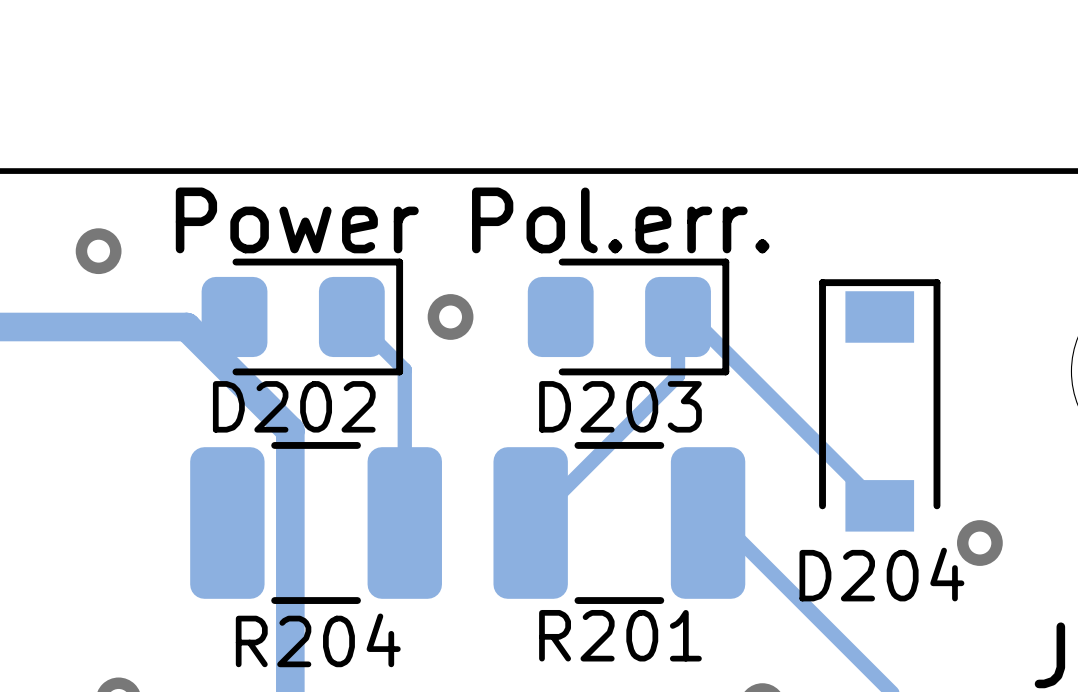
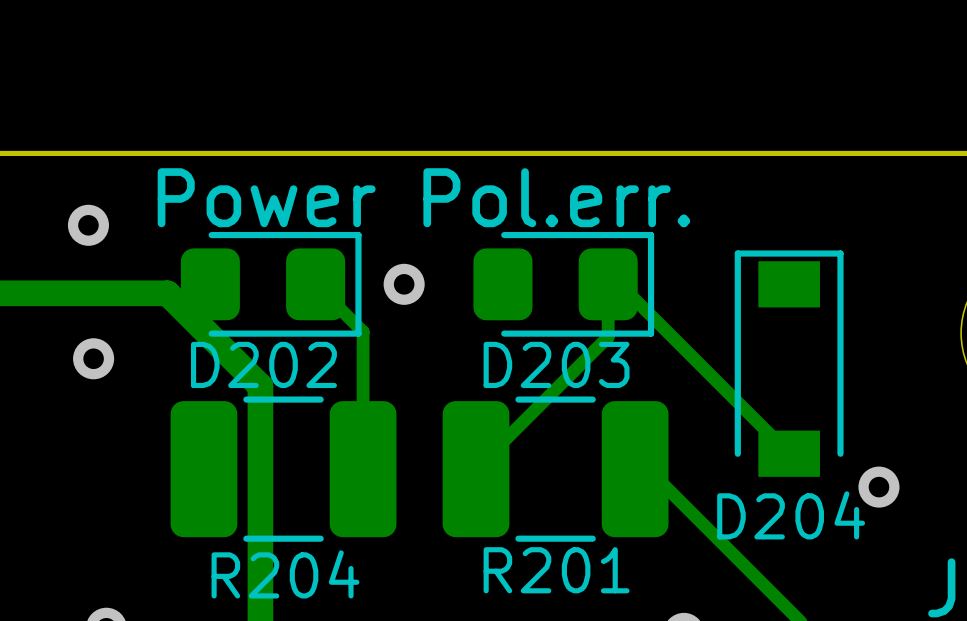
via: none -> (93, 358)

